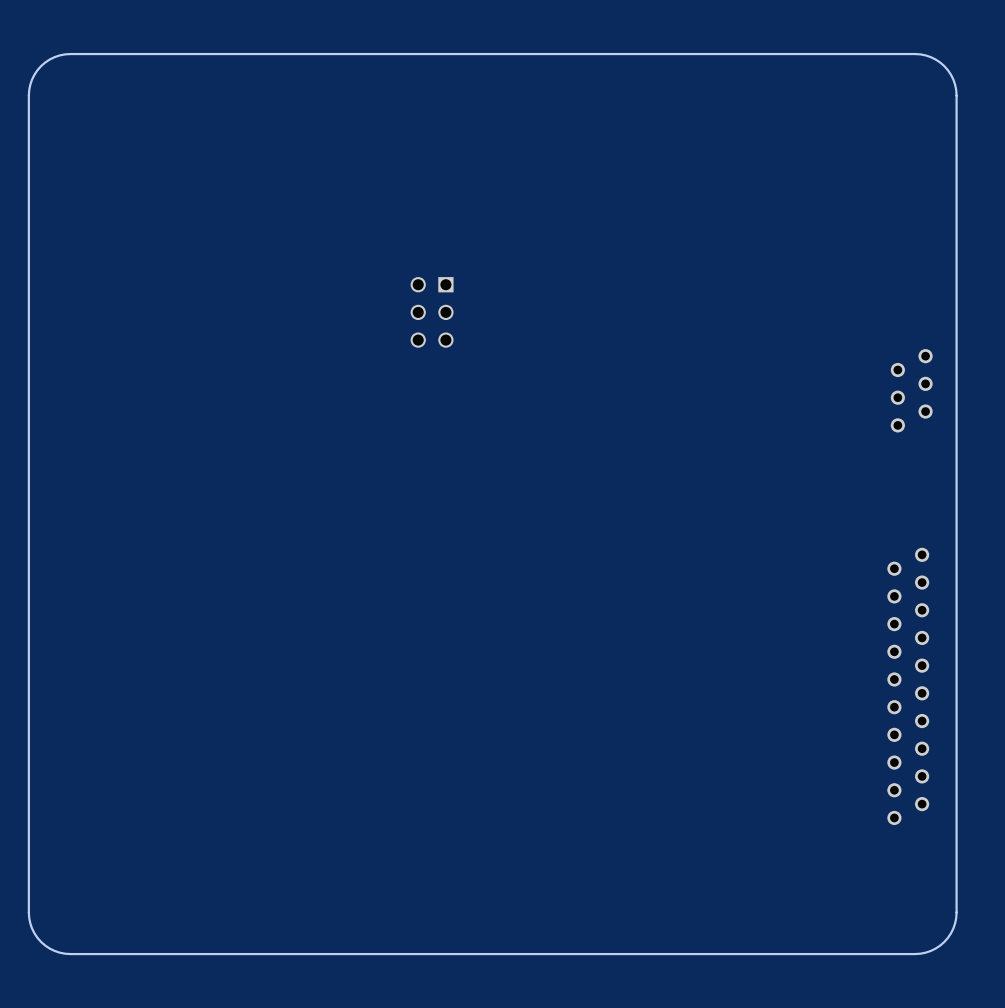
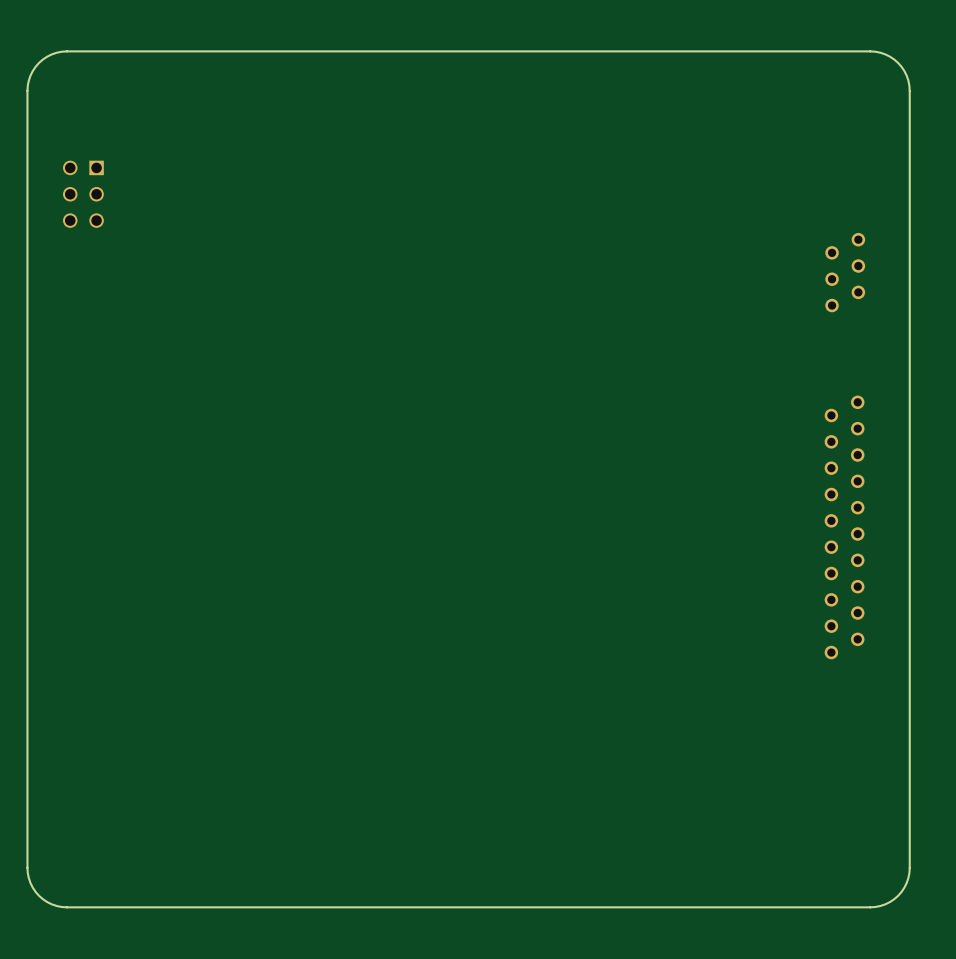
part: none -> (83, 194)
part: (432, 312) -> none
part position: (911, 390) -> (845, 272)
part position: (908, 686) -> (844, 527)

